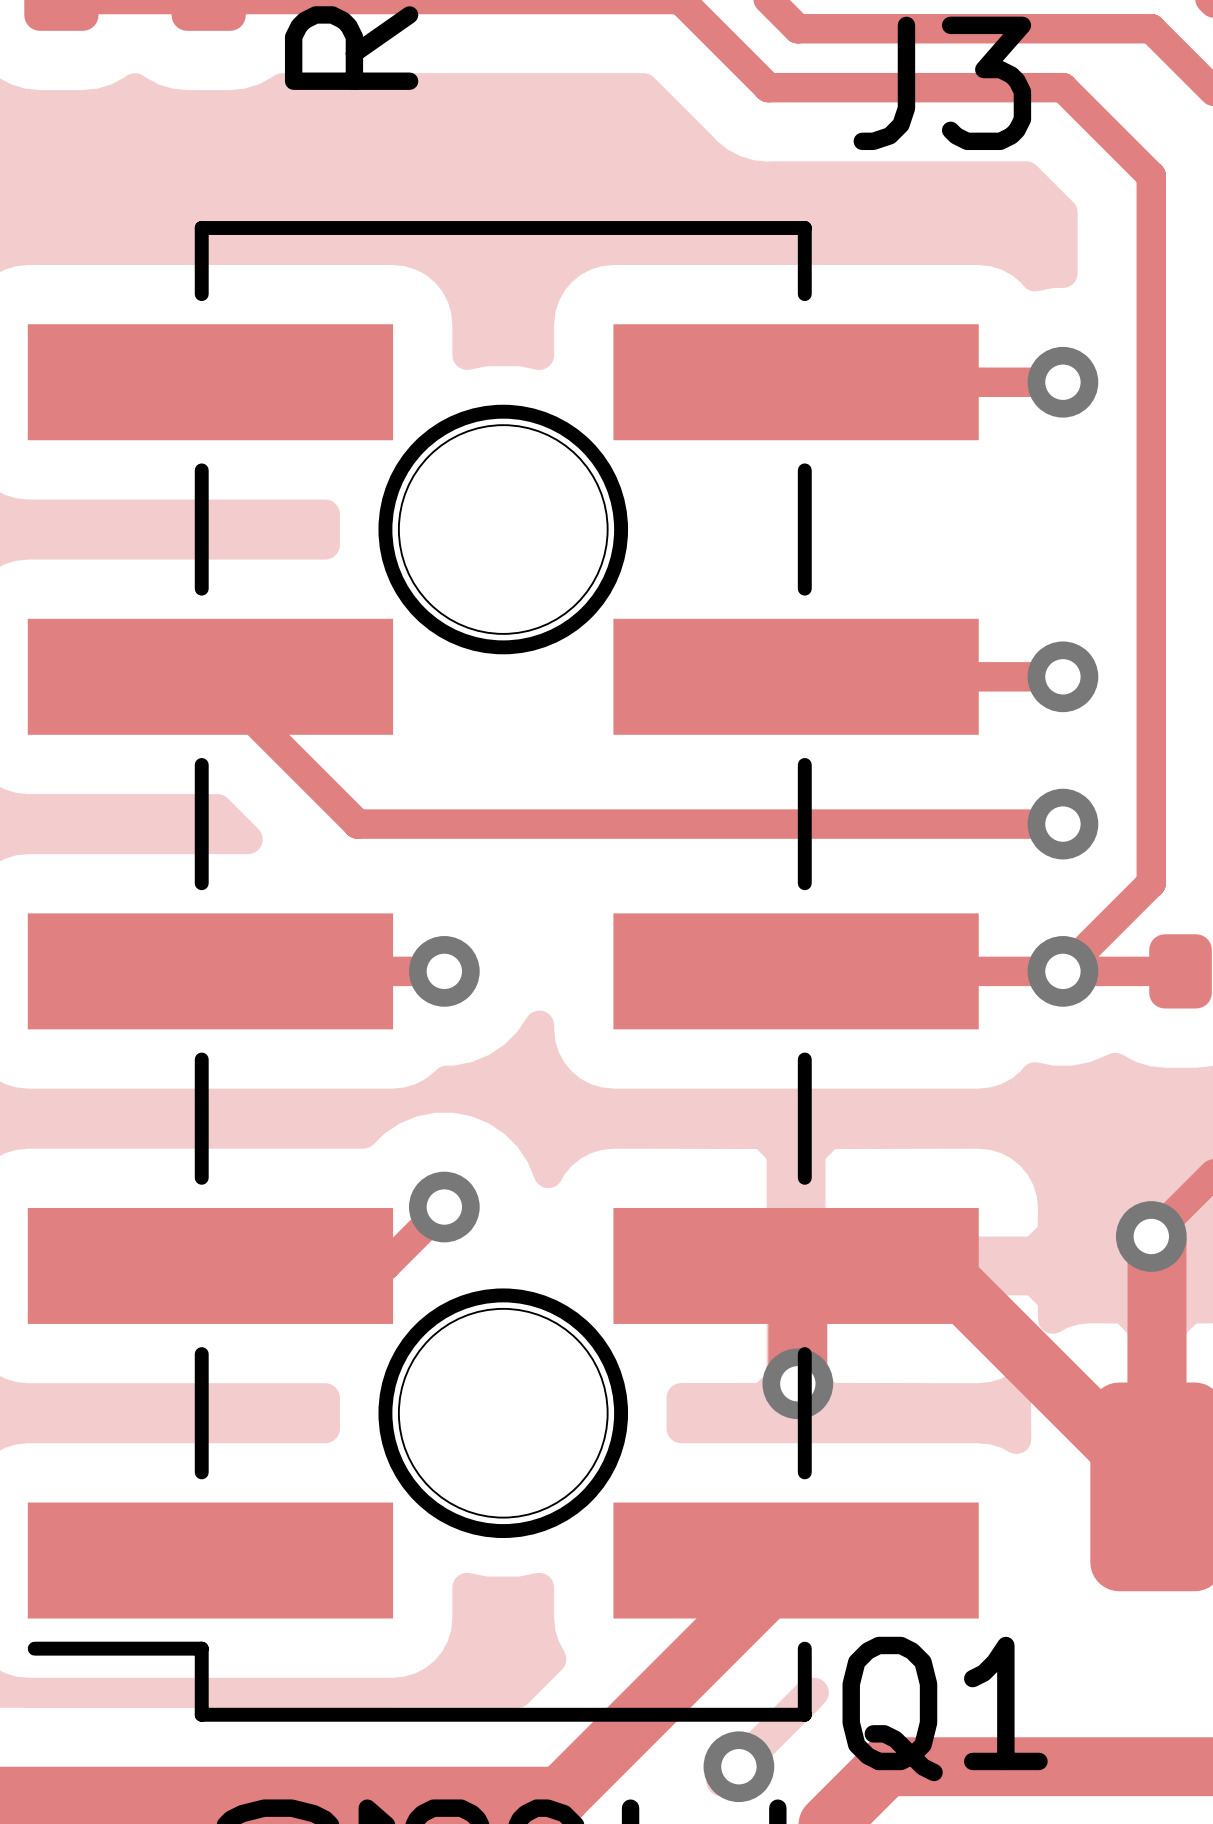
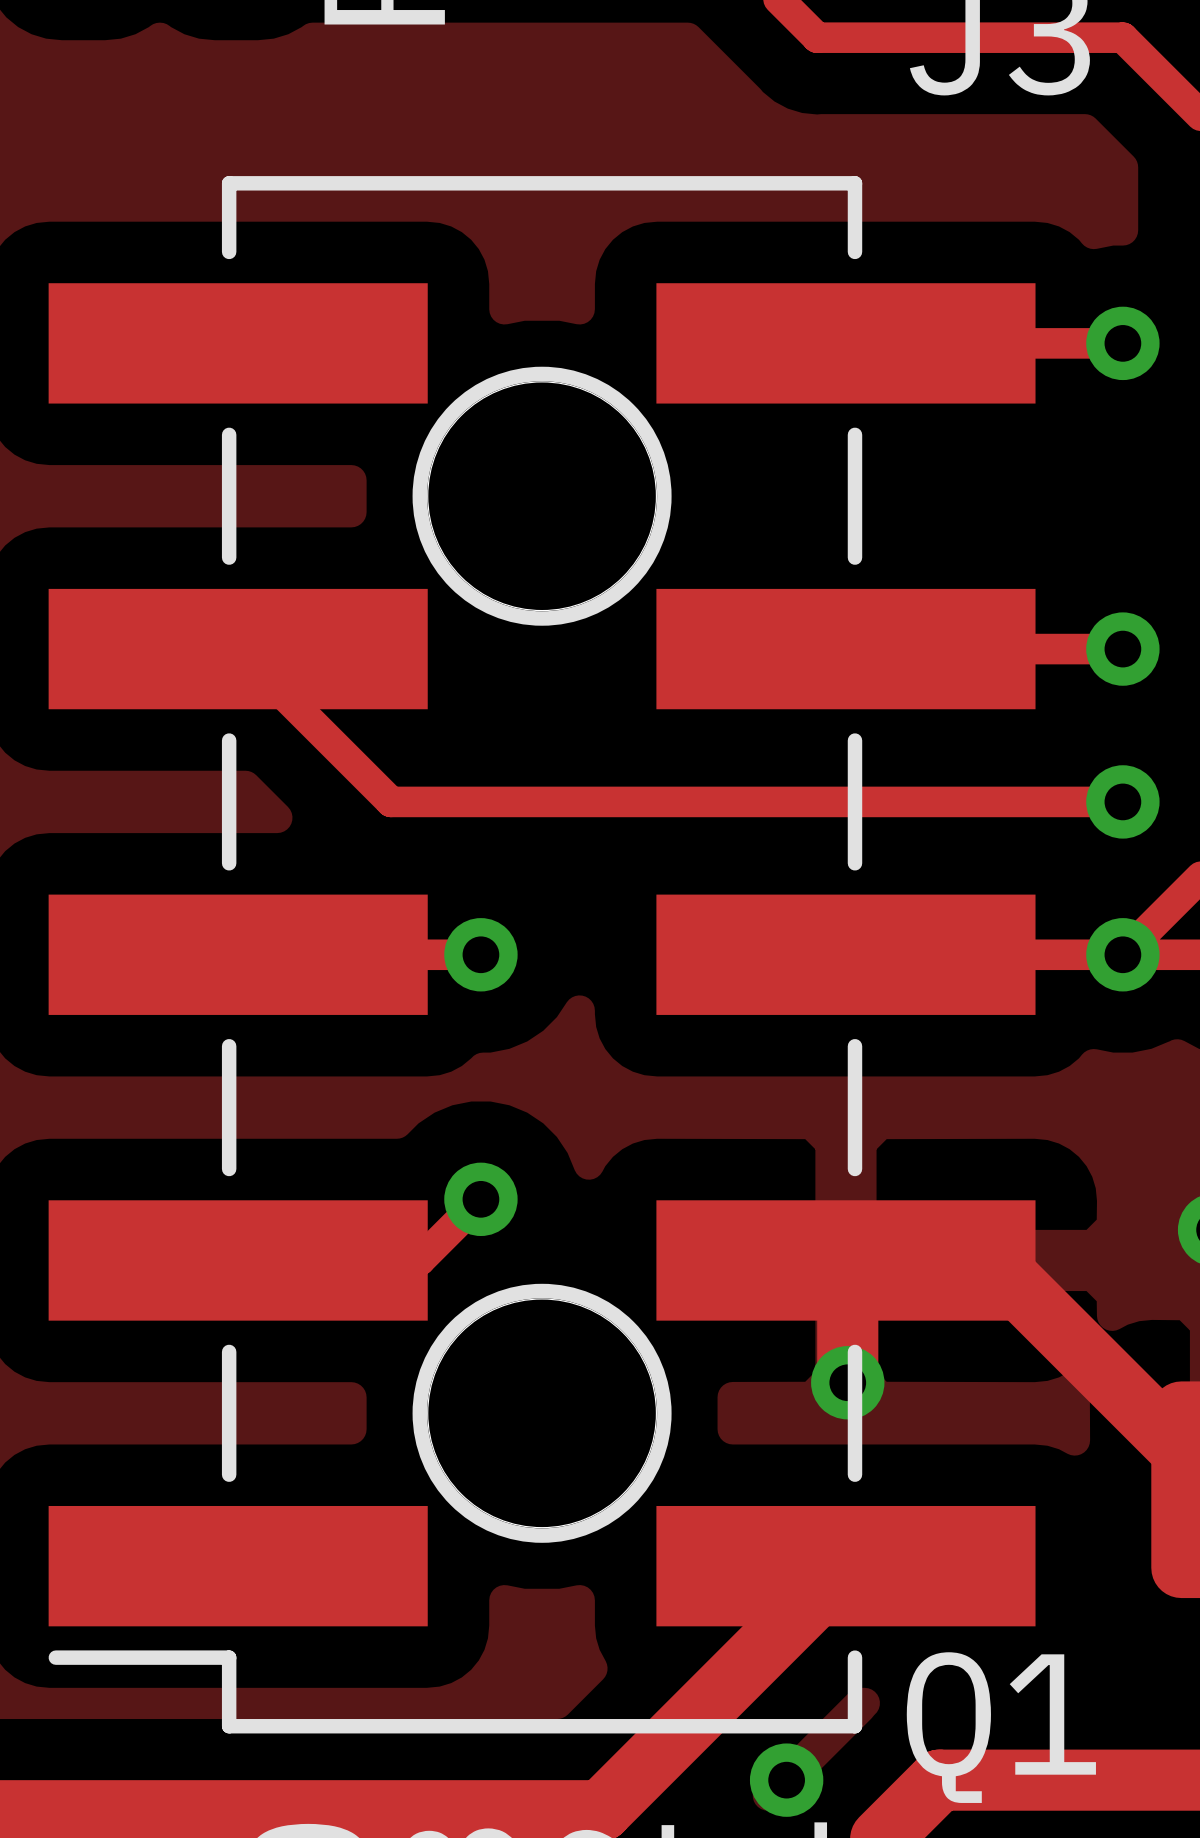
J3 footprint: [27, 221, 979, 1722] -> [48, 176, 1036, 1734]

